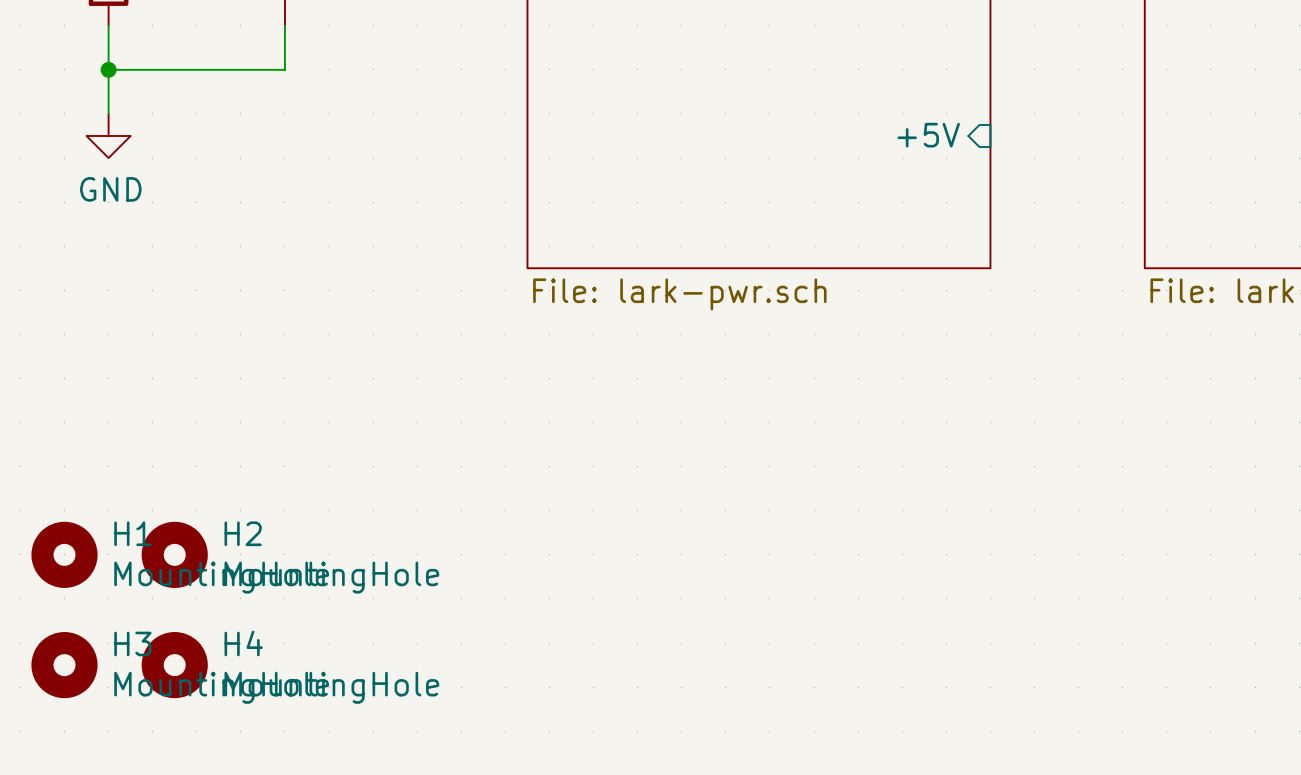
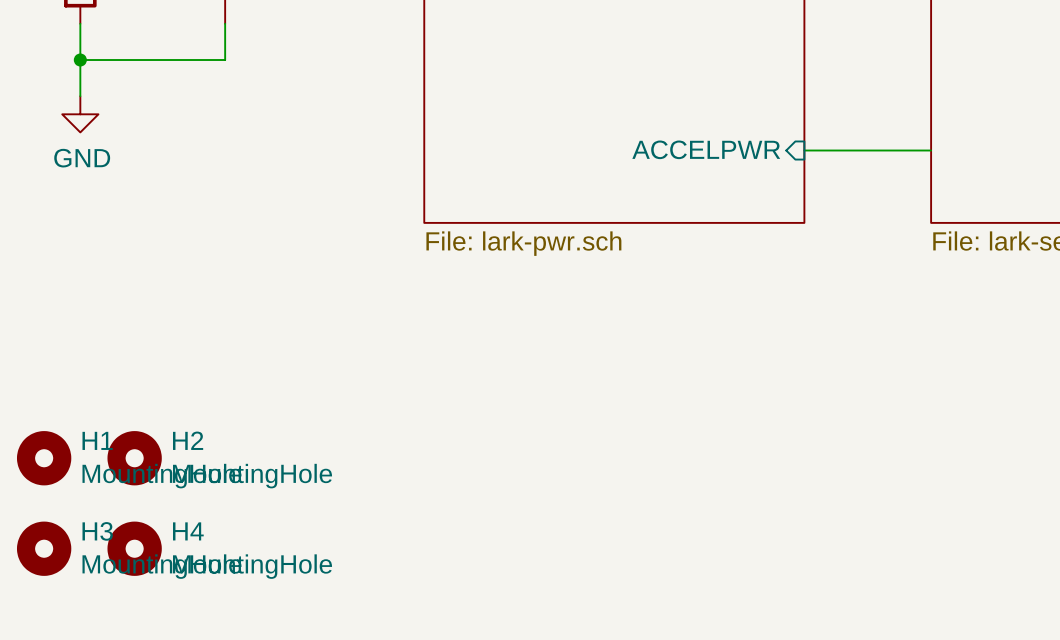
sheet pin: +5V (928, 135) -> none
sheet pin: none -> ACCELPWR (706, 149)
wire: none -> (804, 150) (931, 150)

